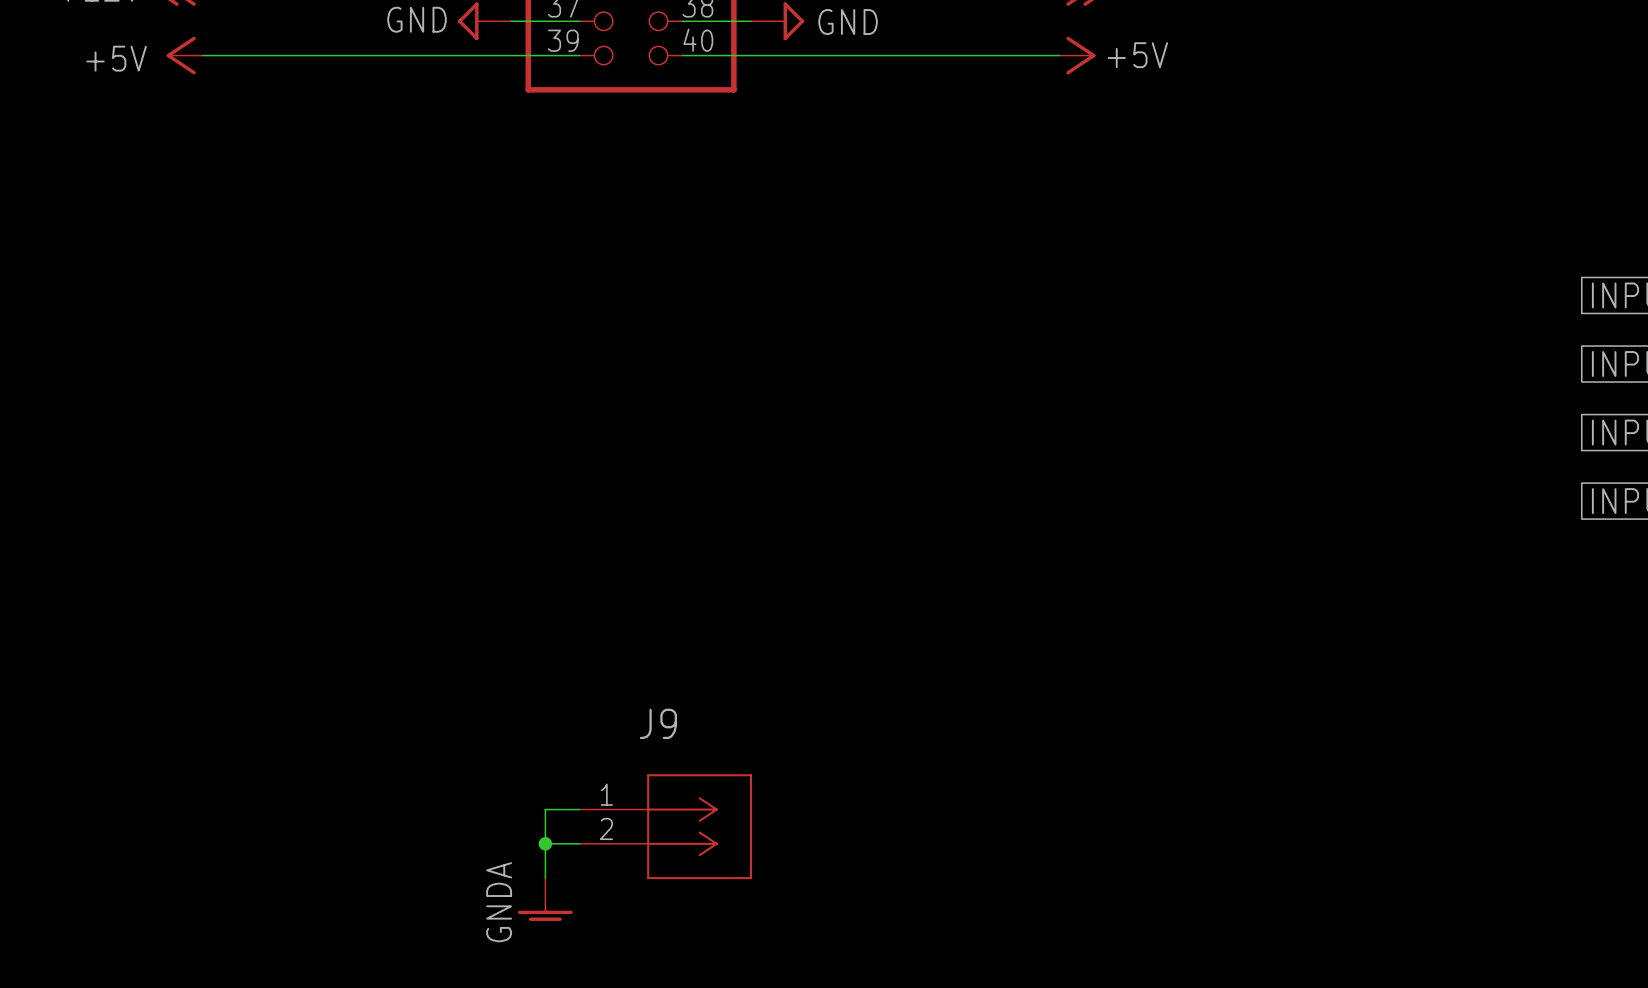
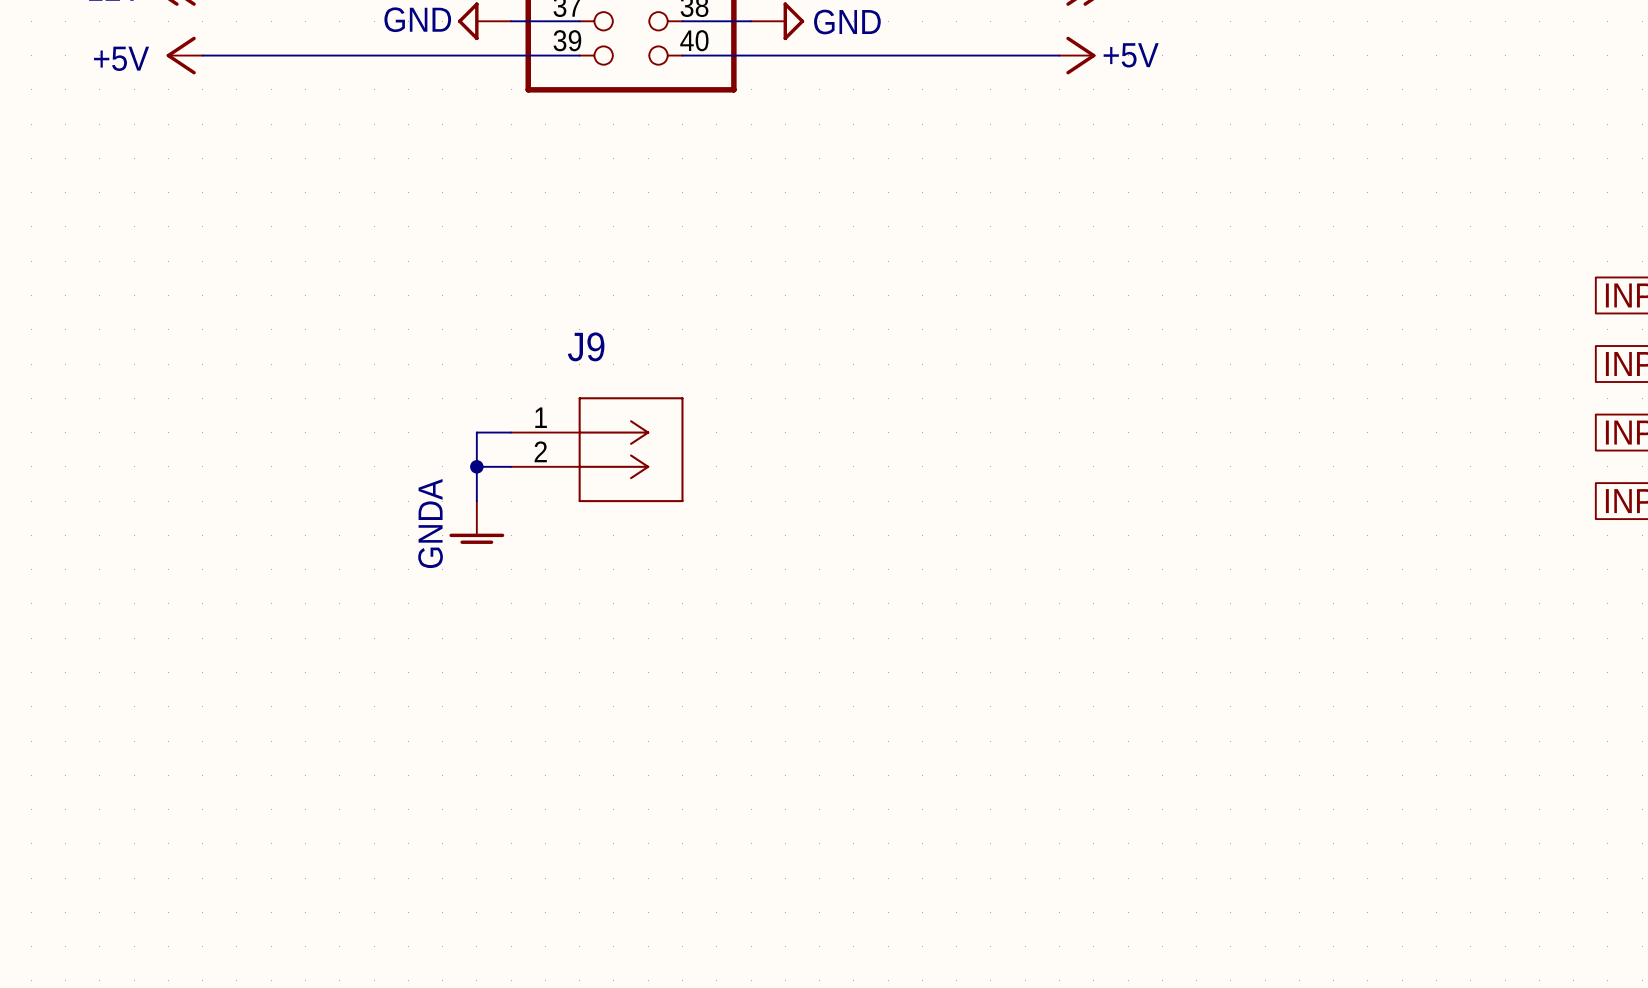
wire: none -> (511, 432) (476, 432) (476, 501)
wire: none -> (476, 466) (511, 466)
junction: none -> (476, 466)
power symbol: none -> GNDA (476, 522)
wire: (579, 809) (545, 809) (545, 878) -> none
J9 position: (665, 826) -> (597, 449)
wire: (545, 843) (579, 843) -> none
junction: (545, 843) -> none
power symbol: GNDA (545, 899) -> none

